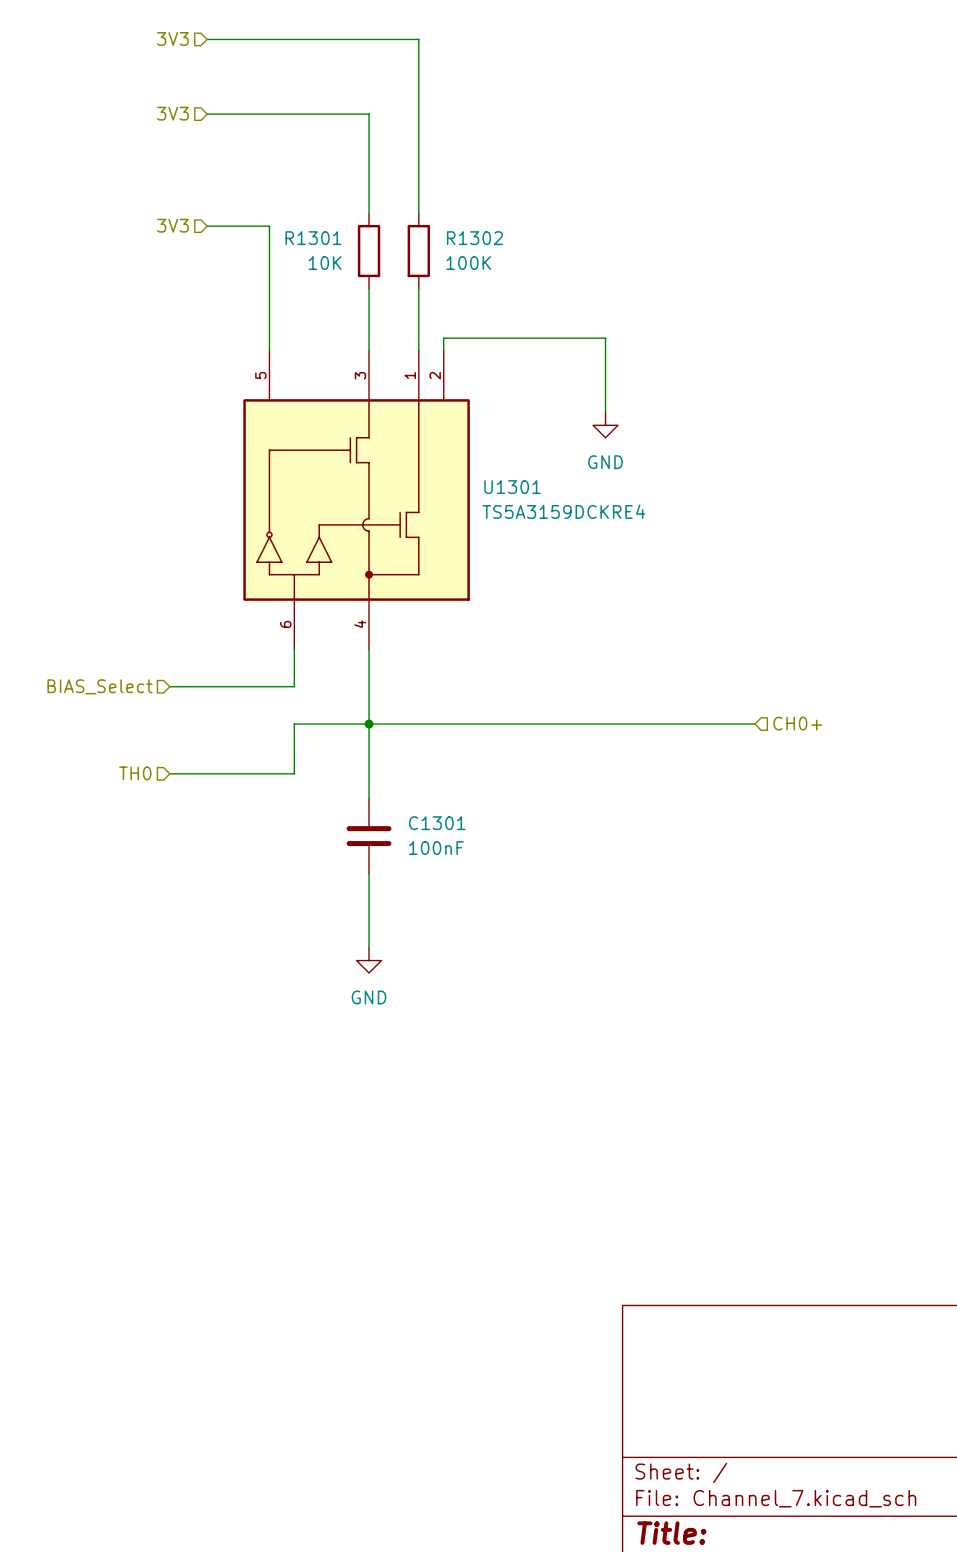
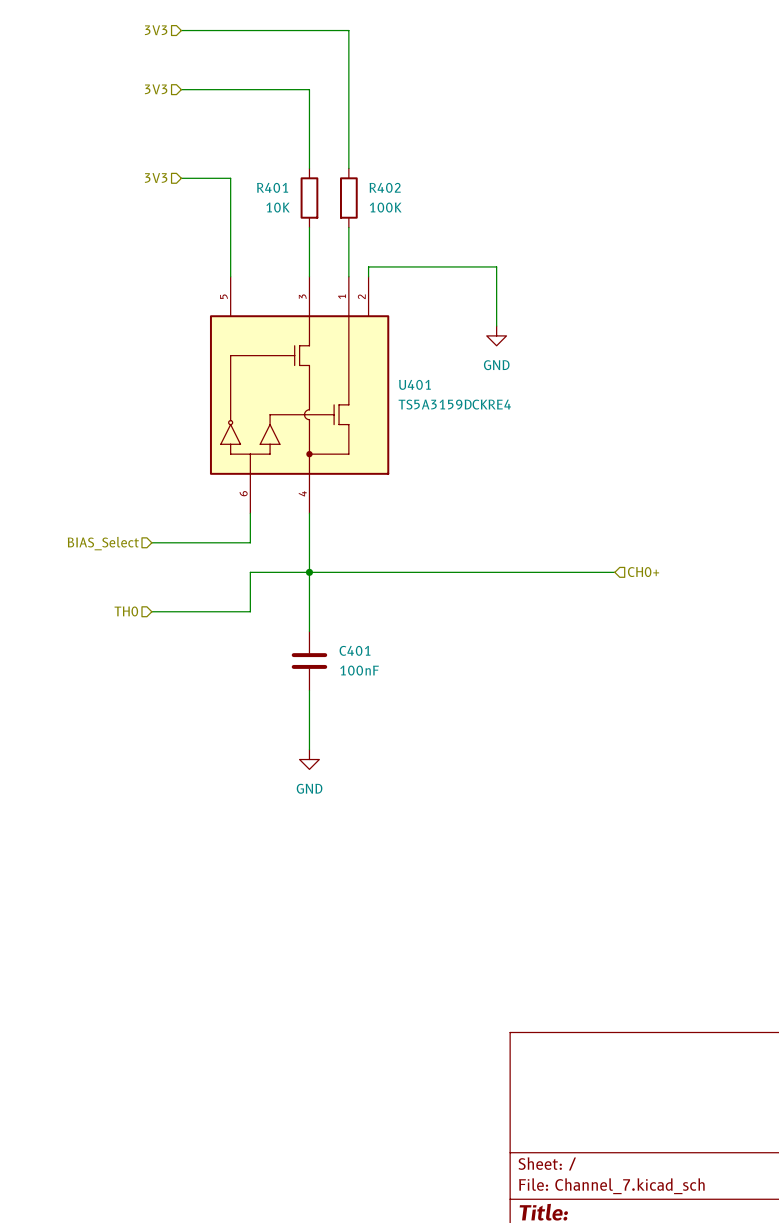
R1301 name: R1301 (313, 238) -> R401 (272, 187)
R1302 name: R1302 (474, 238) -> R402 (385, 187)
U1301 name: U1301 (512, 487) -> U401 (414, 384)
C1301 name: C1301 (437, 823) -> C401 (355, 650)

